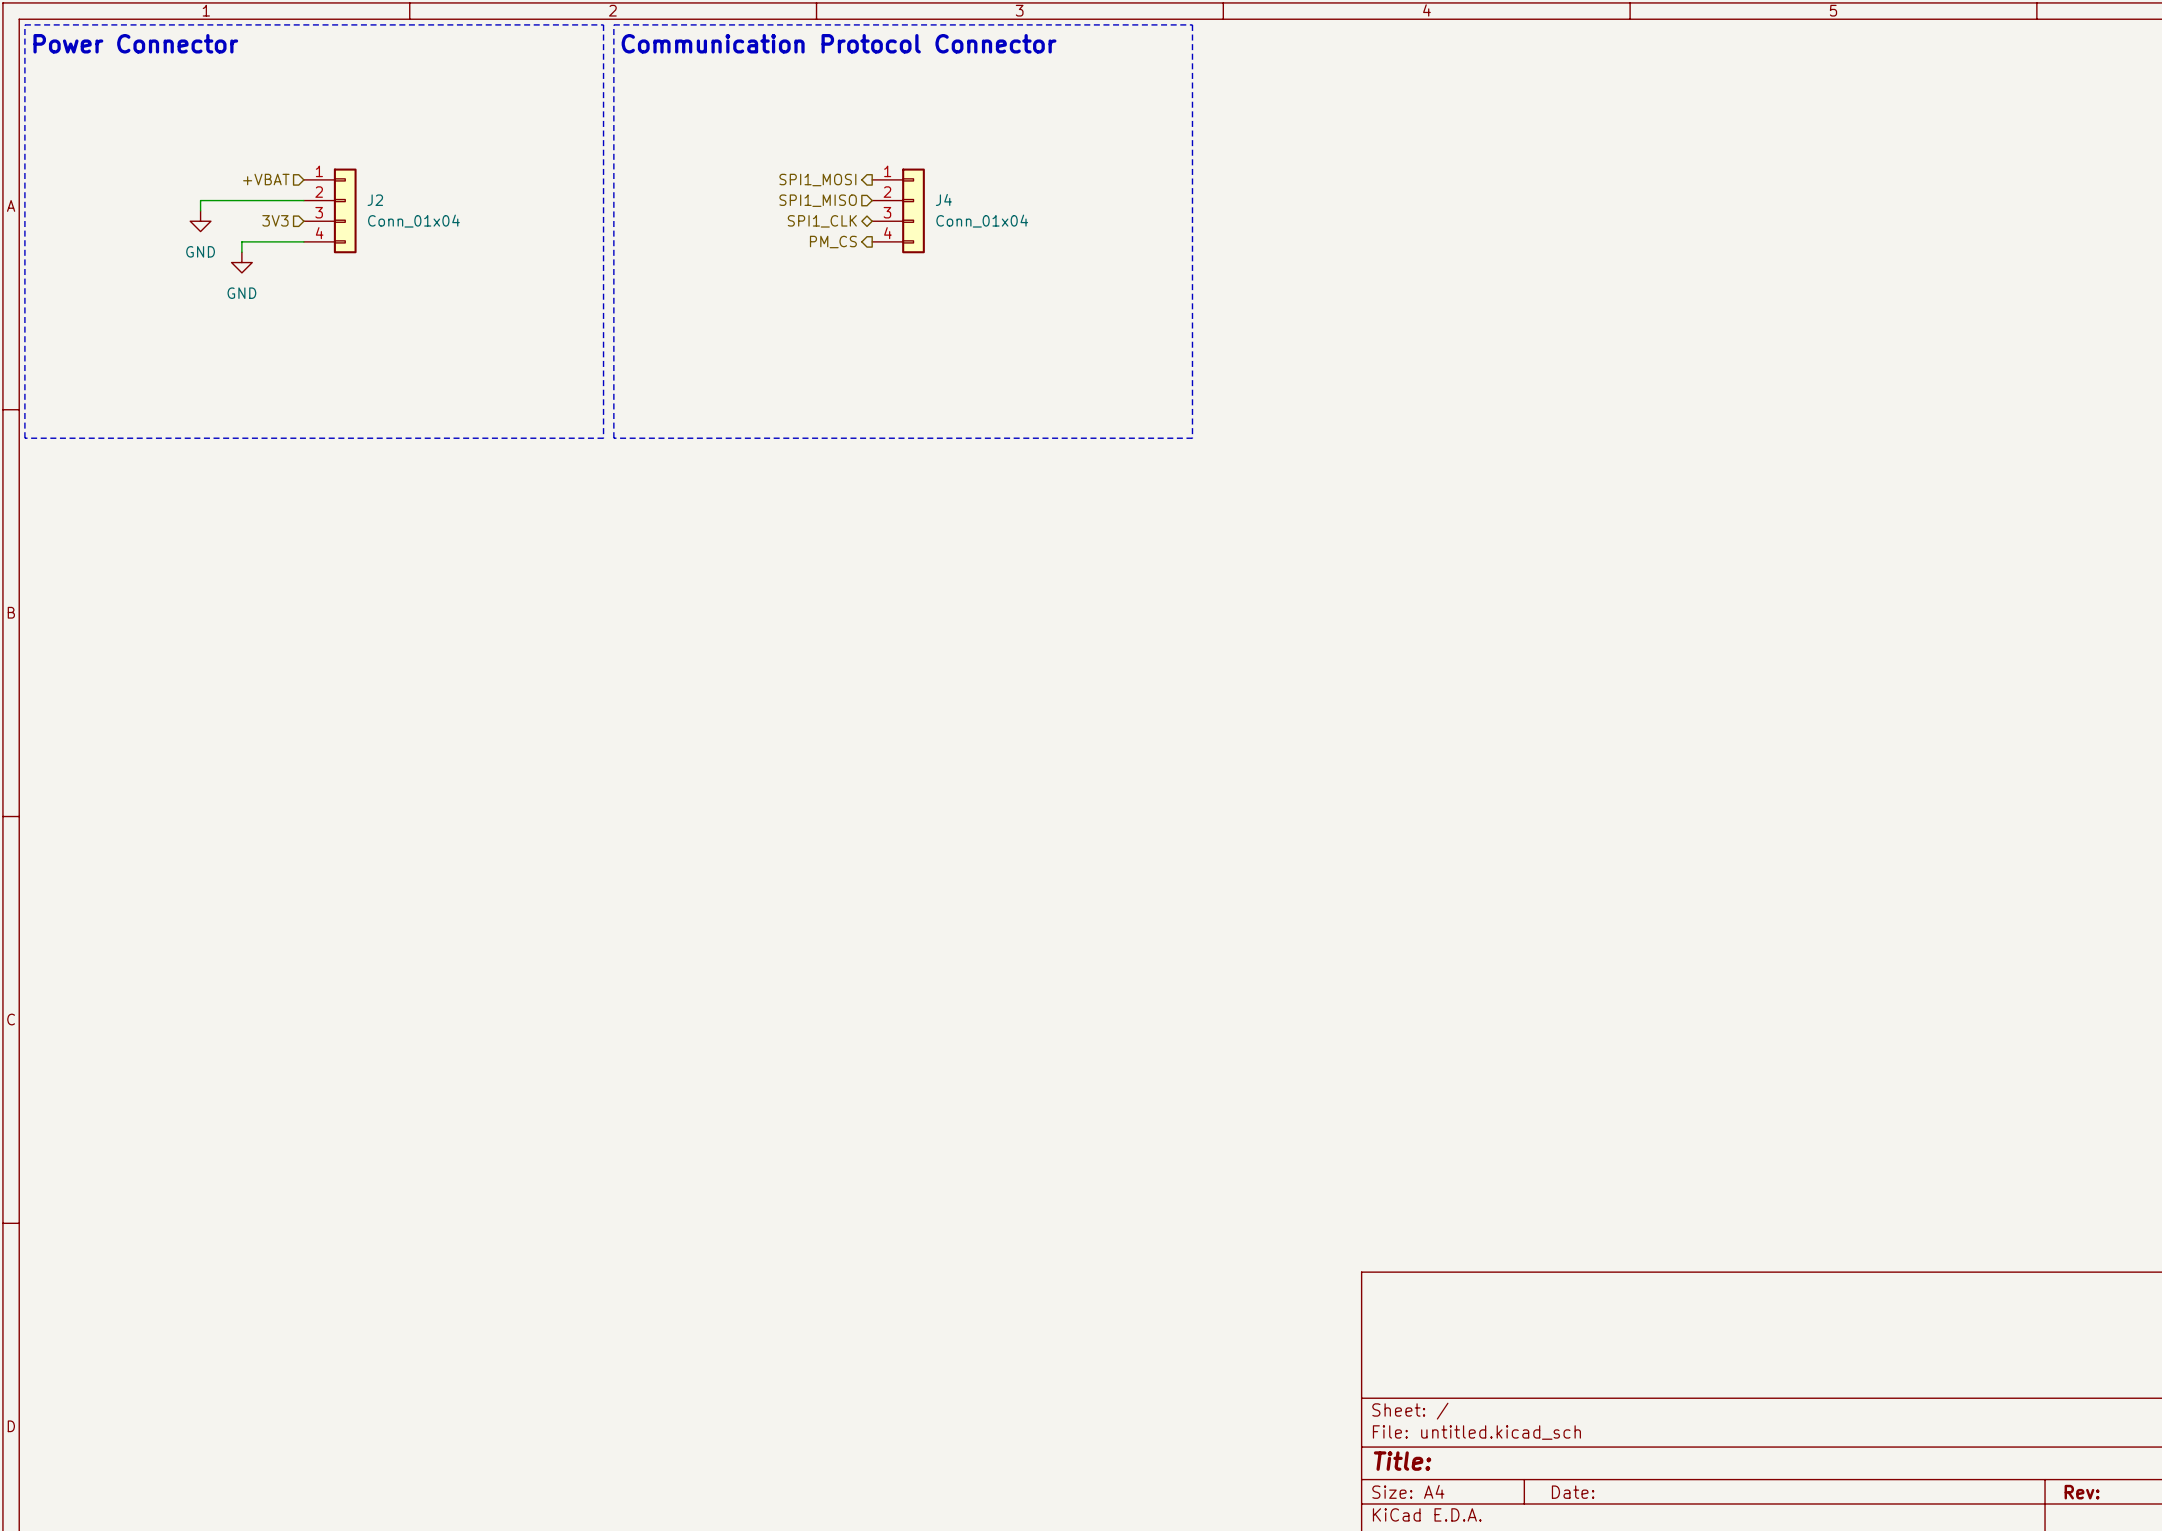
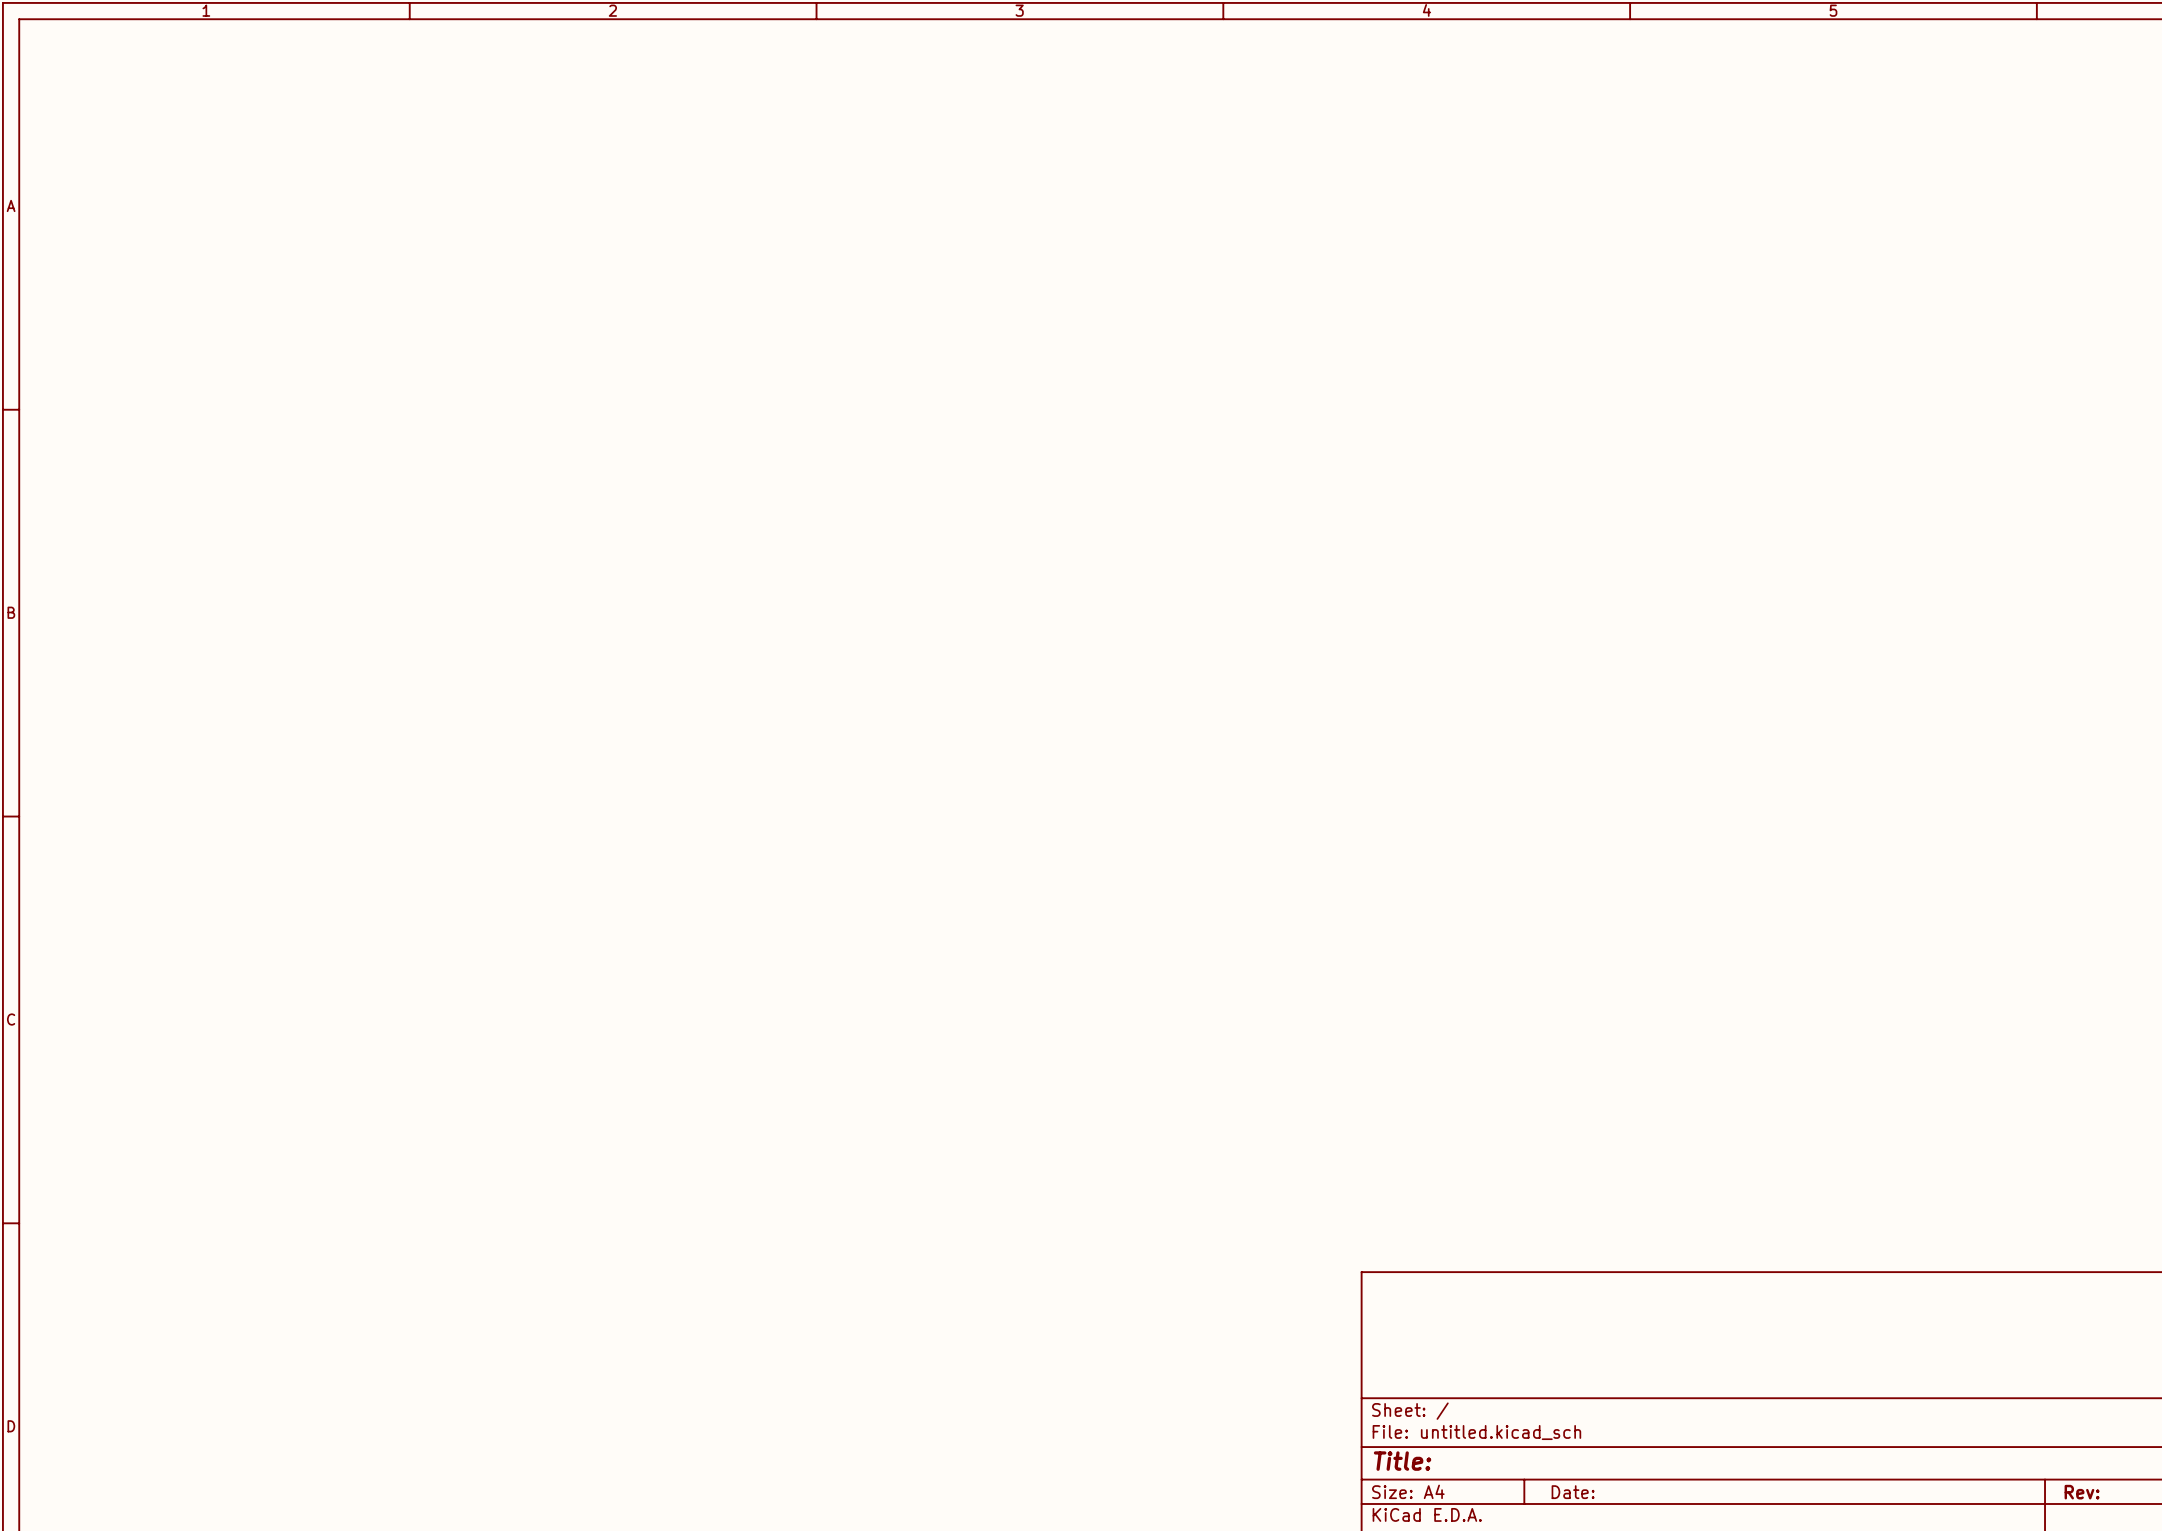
line: (24, 24) (603, 24) (603, 438) (24, 438) (24, 24) -> none
line: (613, 24) (1192, 24) (1192, 438) (613, 438) (613, 24) -> none
text: Power Connector (135, 43) -> none
text: Communication Protocol Connector (839, 43) -> none
hierarchical label: +VBAT (266, 179) -> none
hierarchical label: SPI1_MOSI (817, 180) -> none
wire: (303, 200) (200, 200) (200, 210) -> none
hierarchical label: SPI1_MISO (818, 200) -> none
J2: Conn_01x04 (330, 210) -> none
J4: Conn_01x04 (898, 210) -> none
hierarchical label: 3V3 (275, 220) -> none
power symbol: GND (200, 221) -> none
hierarchical label: SPI1_CLK (822, 221) -> none
wire: (303, 241) (241, 241) (241, 252) -> none
hierarchical label: PM_CS (833, 242) -> none
power symbol: GND (241, 262) -> none

